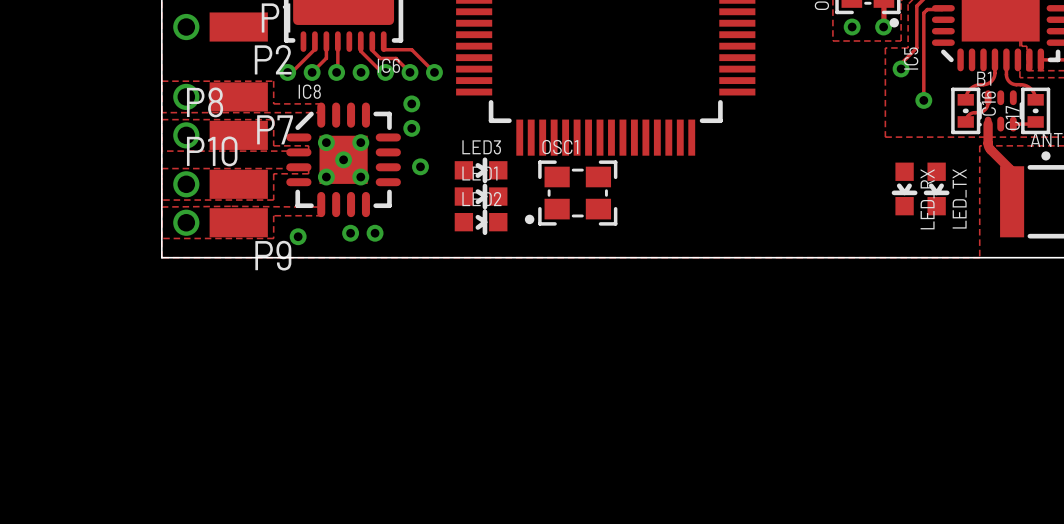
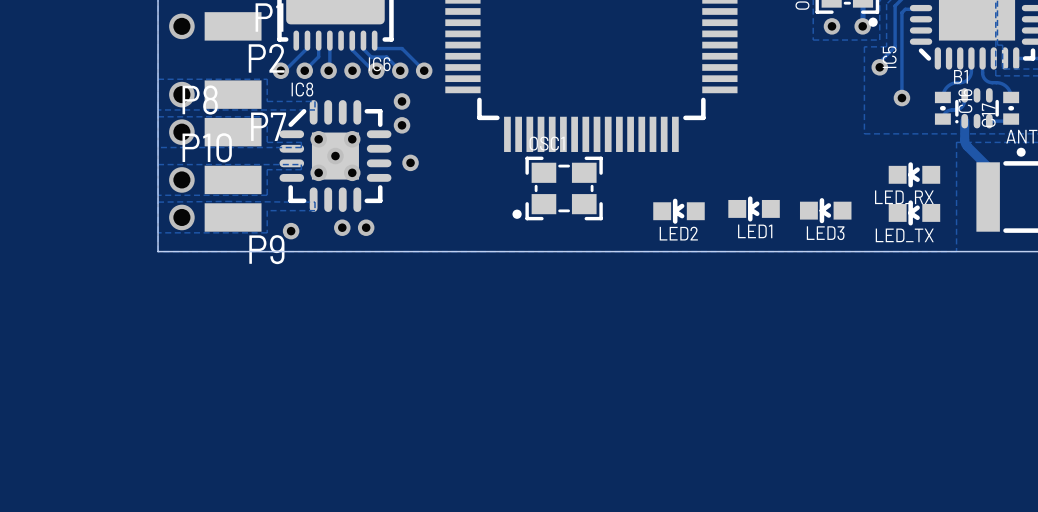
C16 footprint: [951, 87, 981, 135] -> [934, 91, 951, 125]
C17 footprint: [1021, 87, 1051, 135] -> [1003, 91, 1020, 125]
LED3 rotation: 0° (481, 170) -> 180° (825, 210)
LED3 position: (481, 170) -> (825, 210)
LED_RX rotation: 0° (904, 188) -> 90° clockwise (914, 174)
LED_RX position: (904, 188) -> (914, 174)
LED_TX rotation: 0° (936, 188) -> 90° clockwise (914, 212)
LED1 rotation: 0° (481, 196) -> 180° (754, 208)
LED1 position: (481, 196) -> (754, 208)
LED2 rotation: 0° (481, 222) -> 180° (678, 211)
LED2 position: (481, 222) -> (678, 211)

